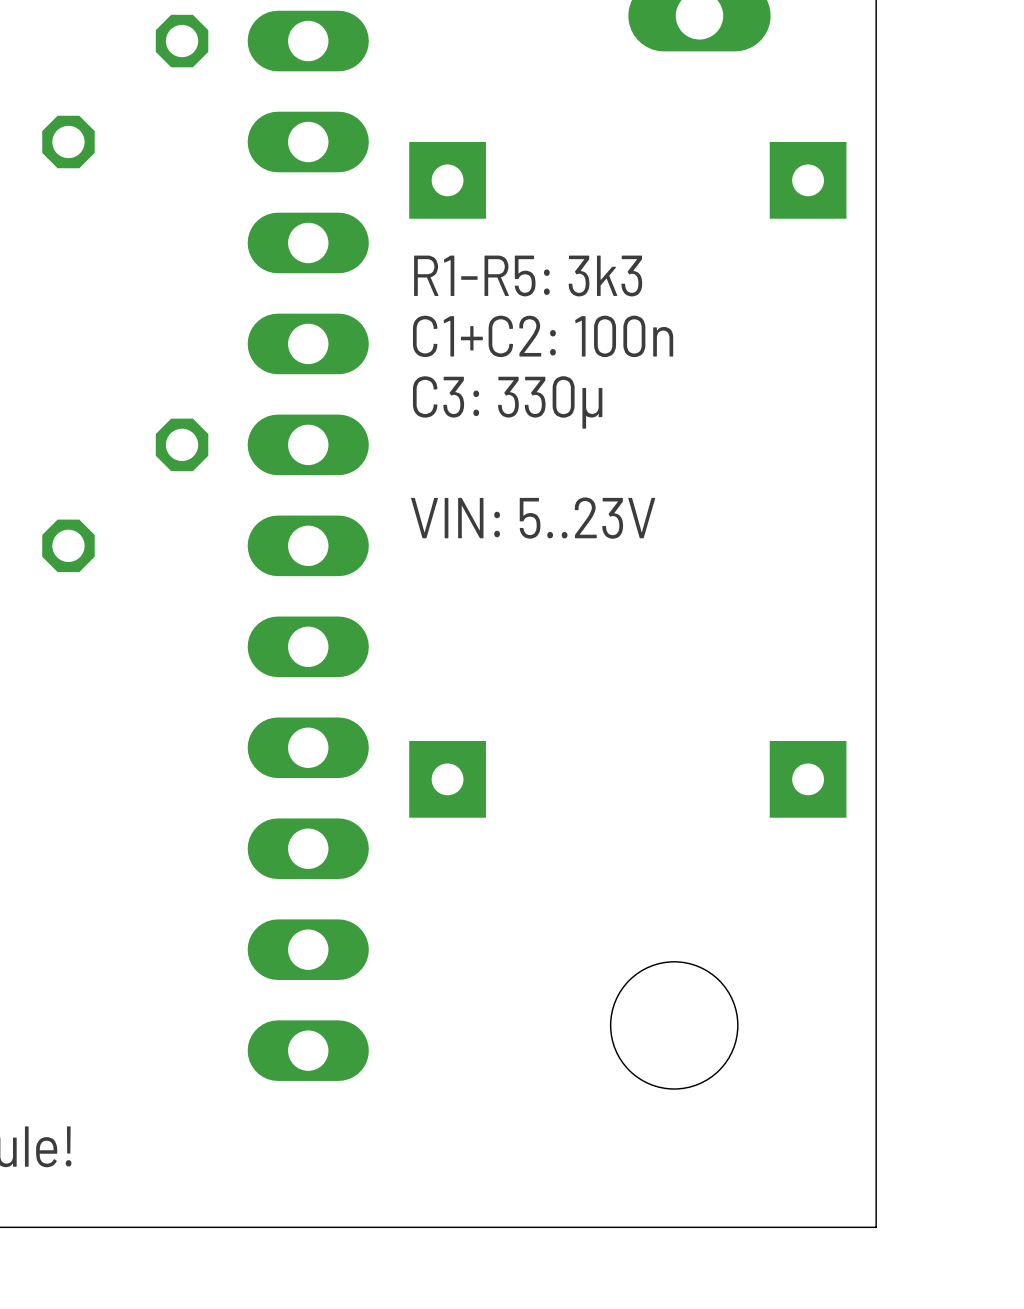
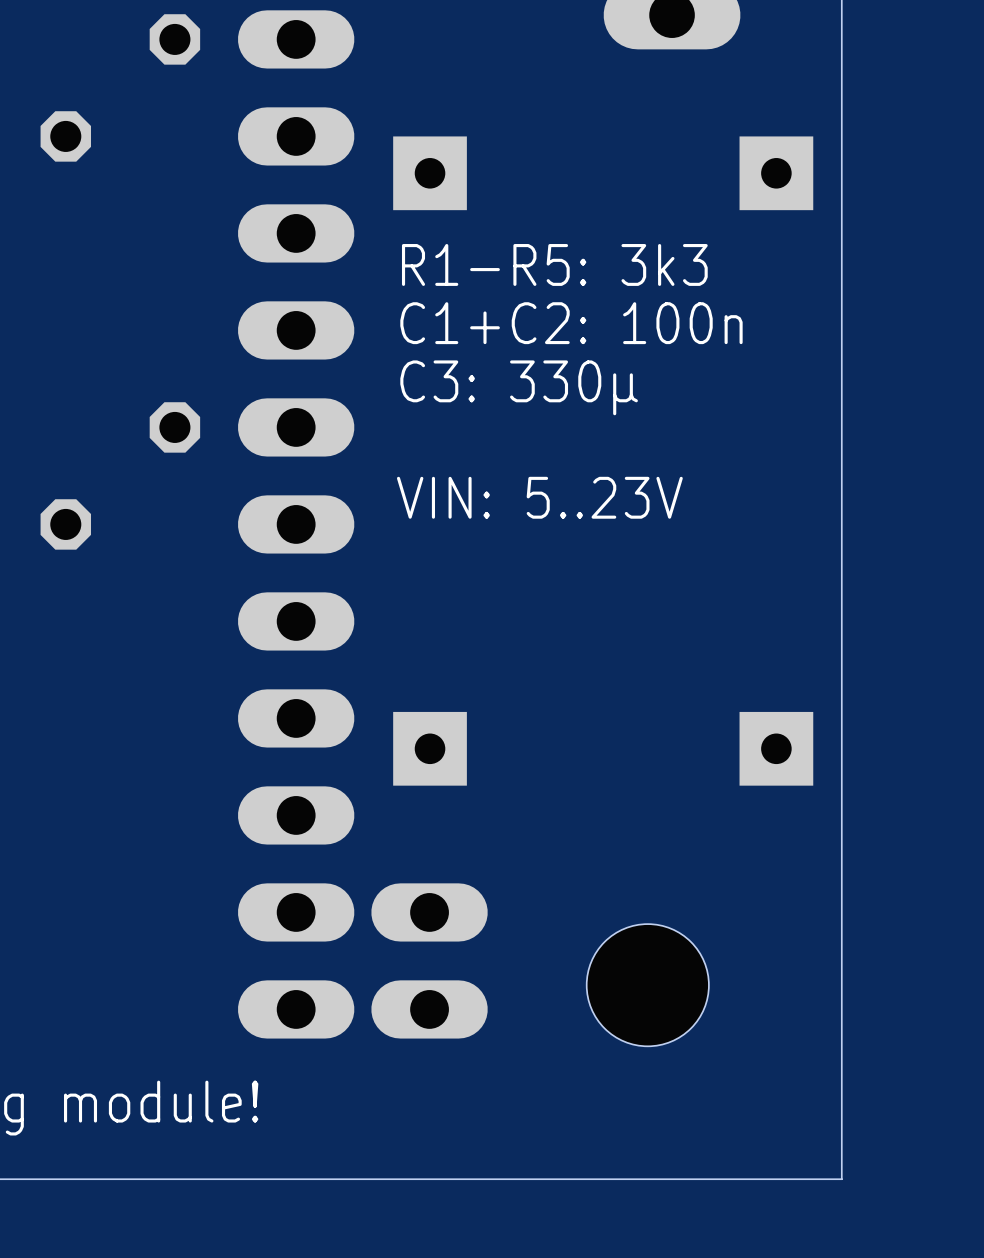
part: none -> (429, 960)

